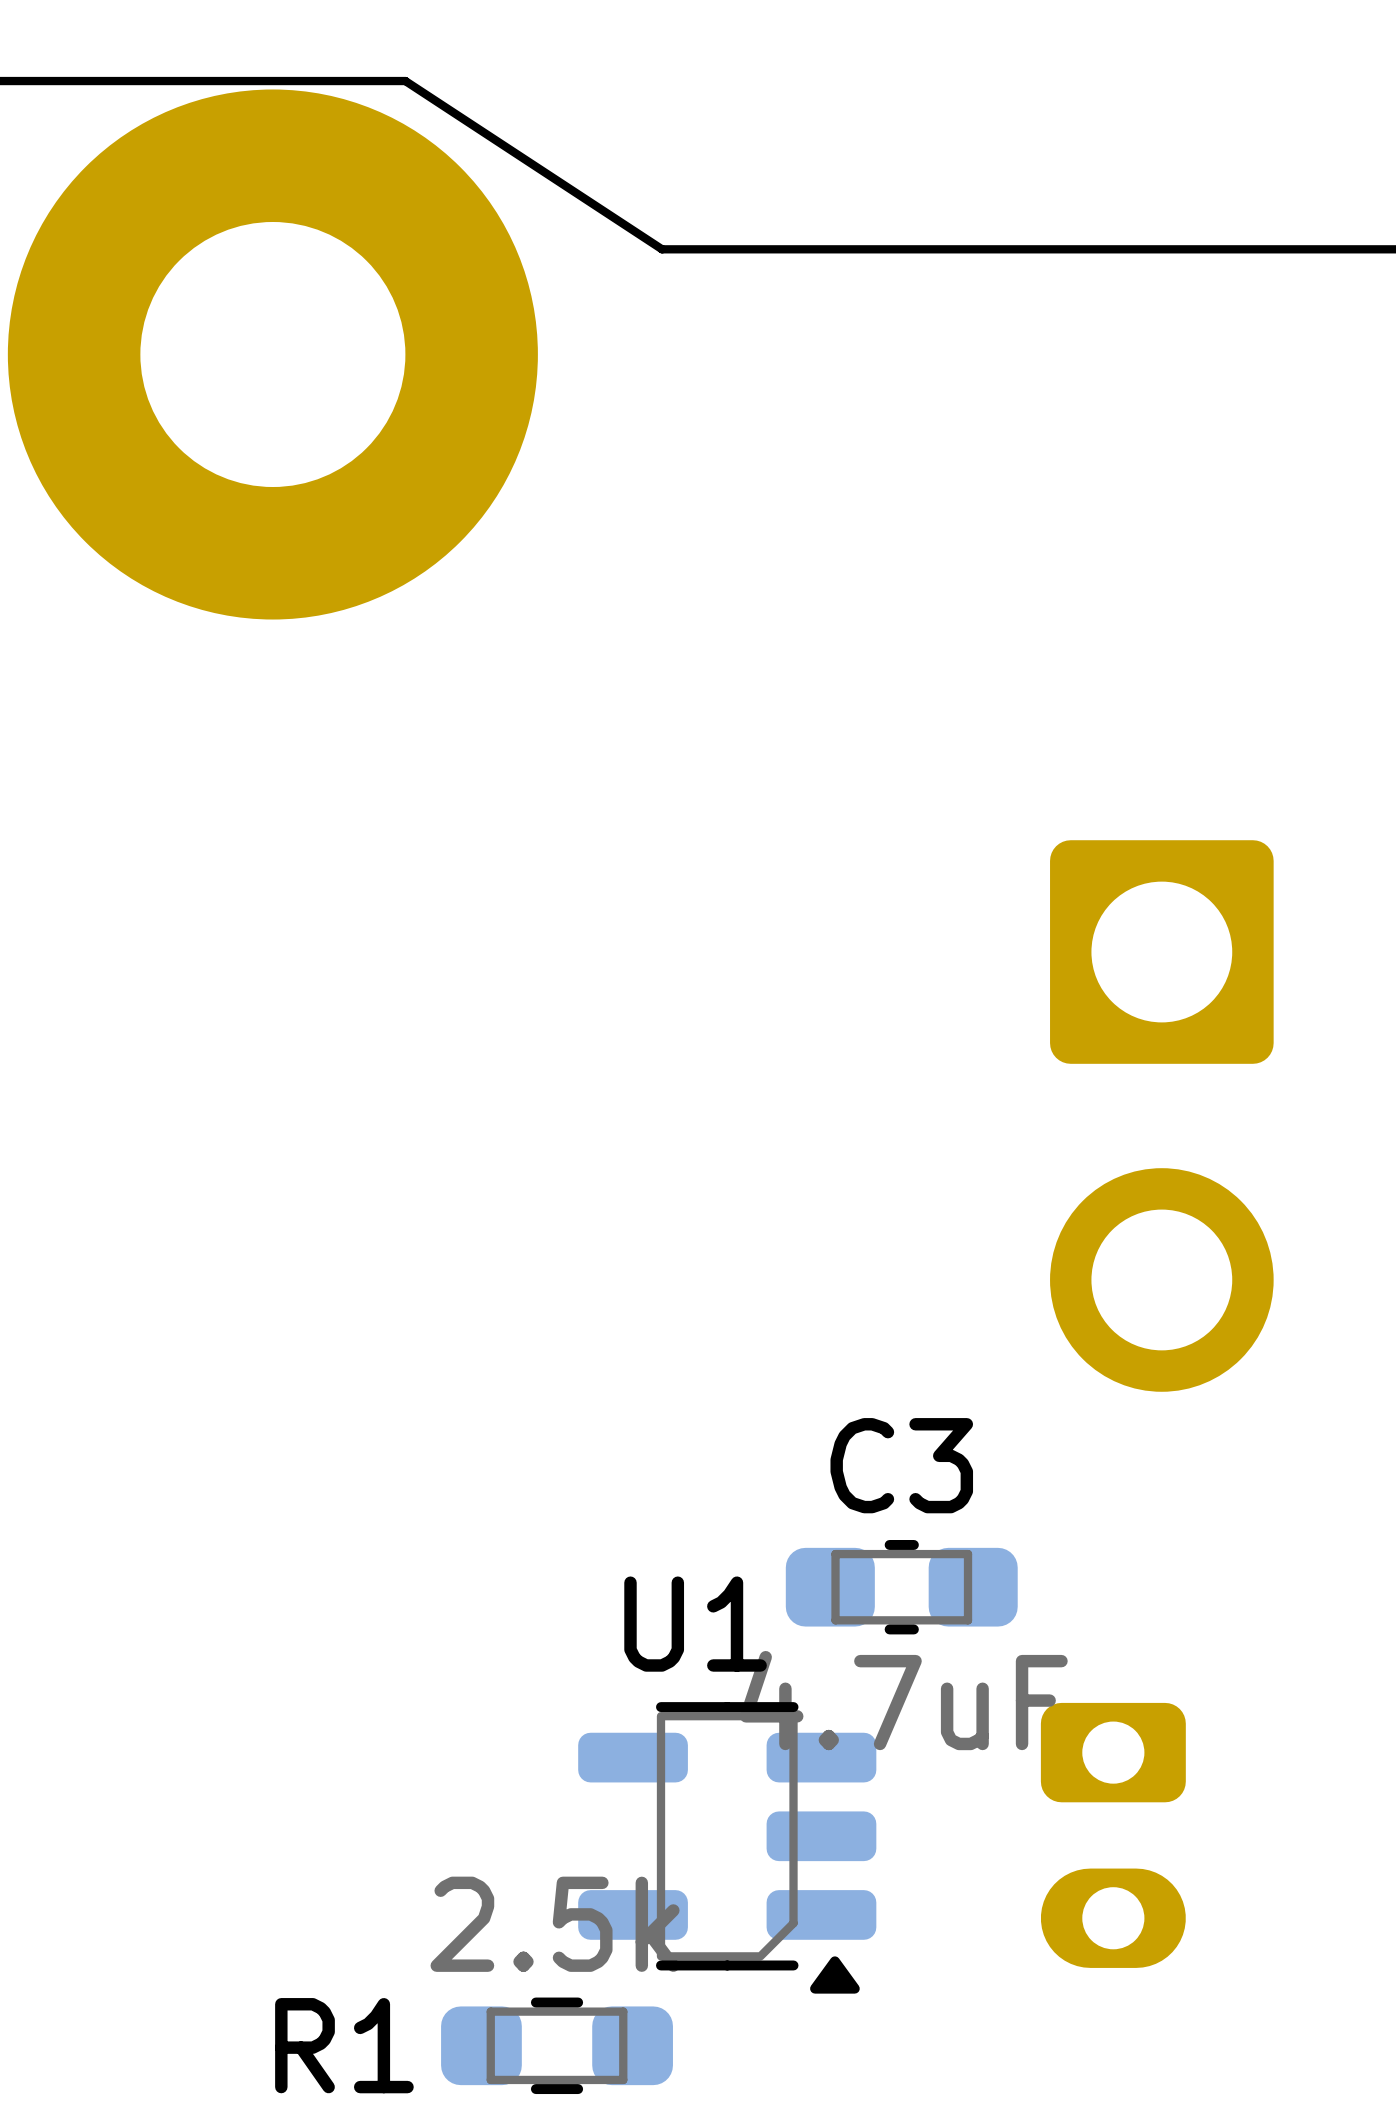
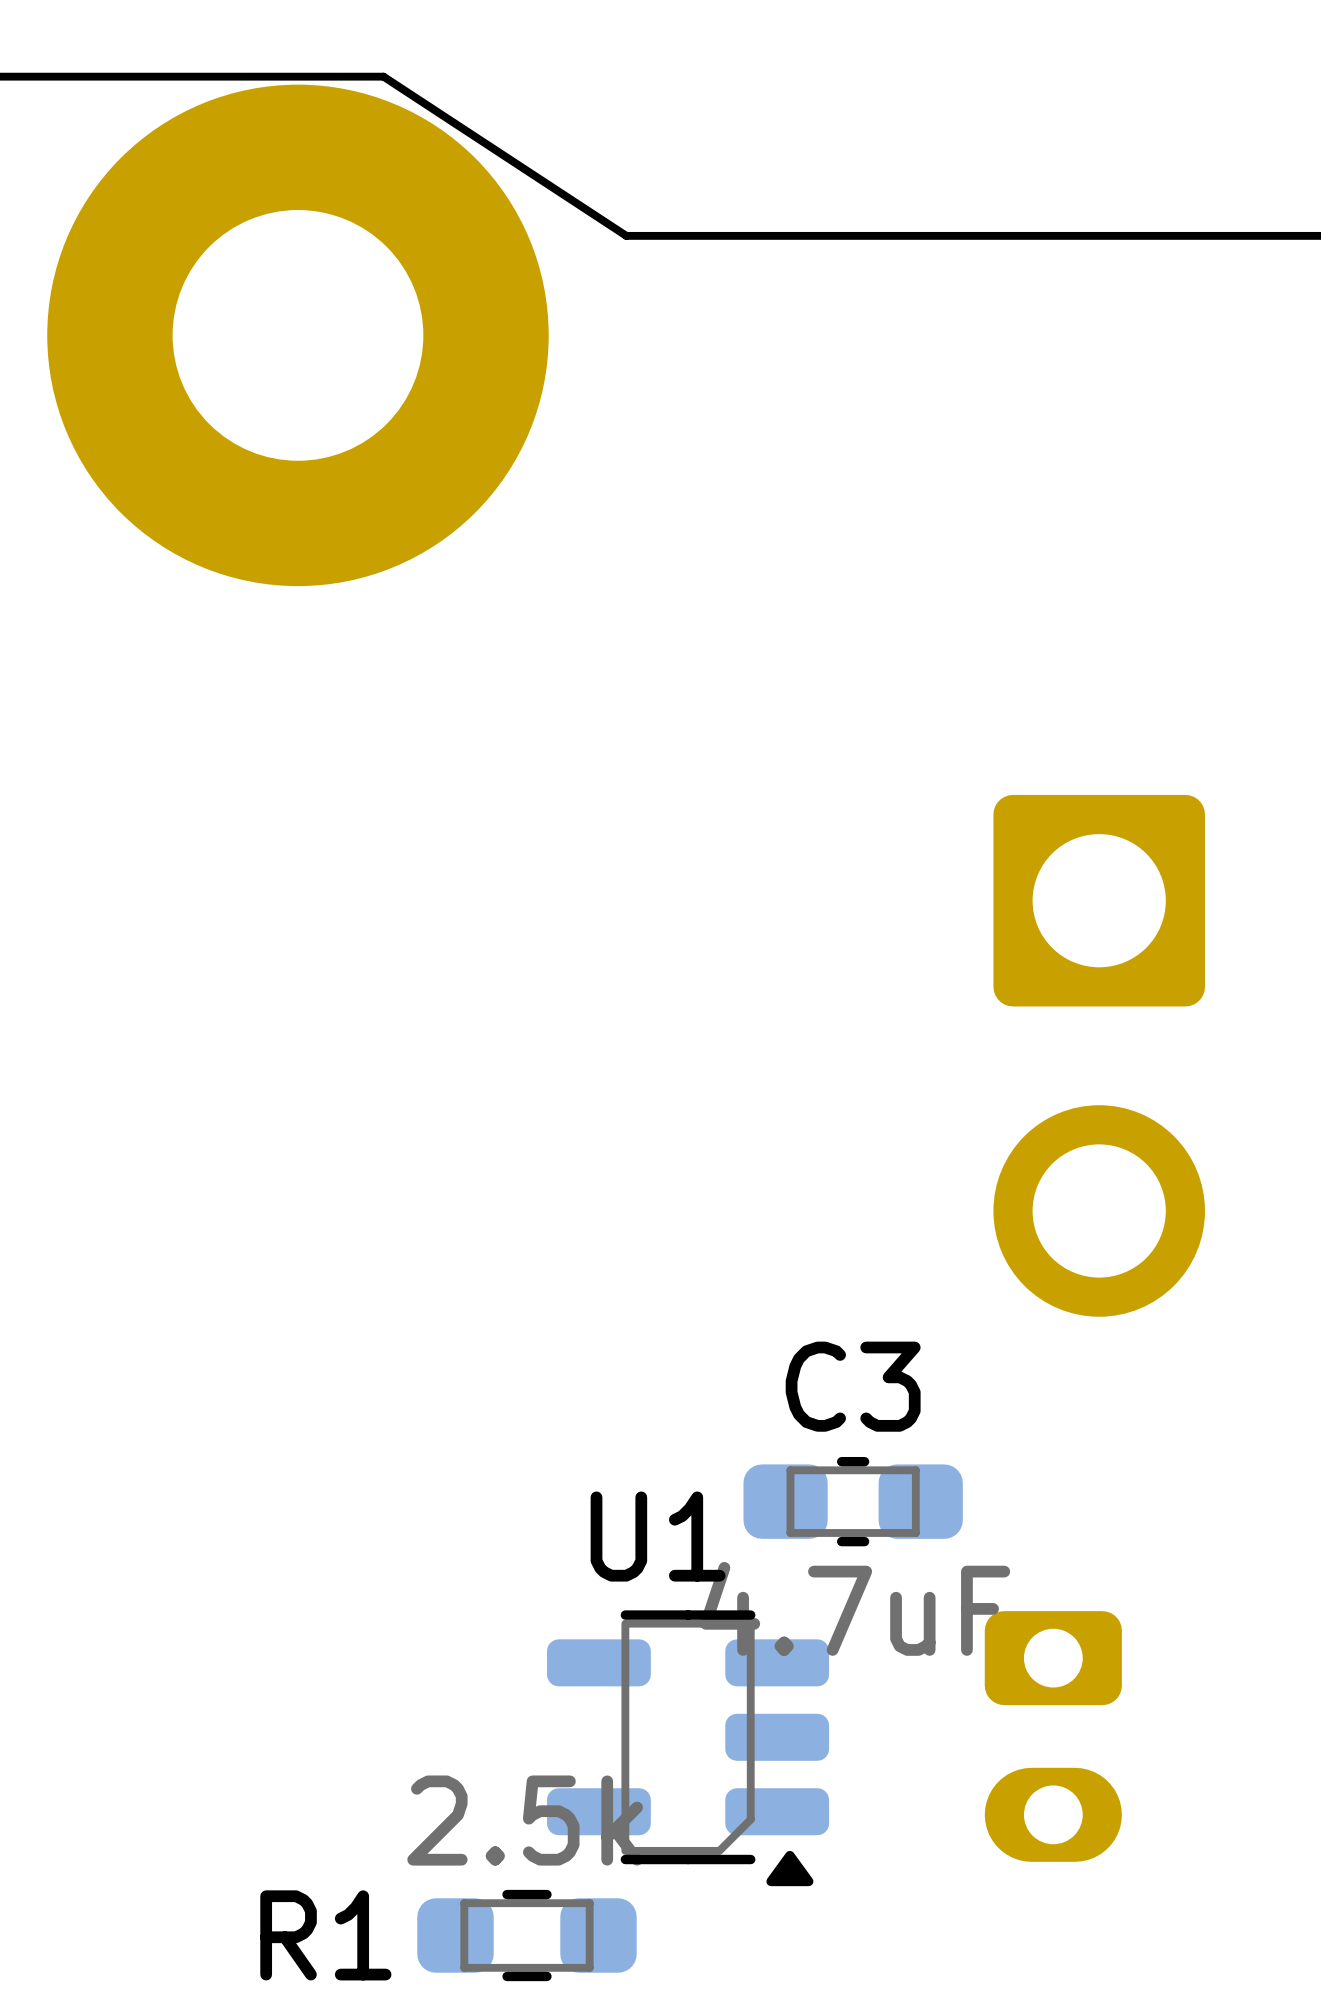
part position: (272, 354) -> (297, 335)

